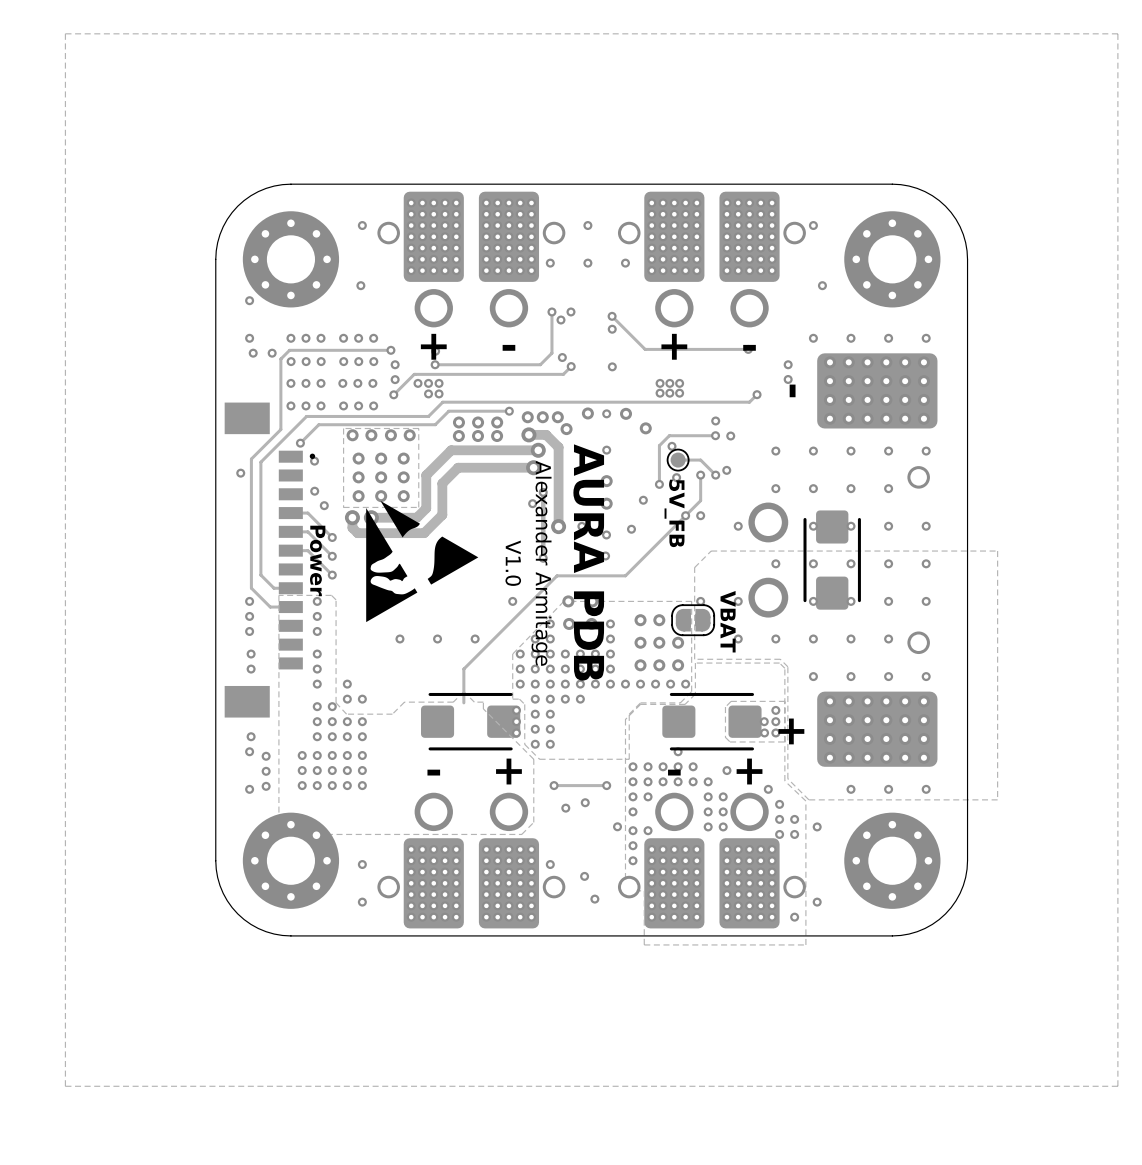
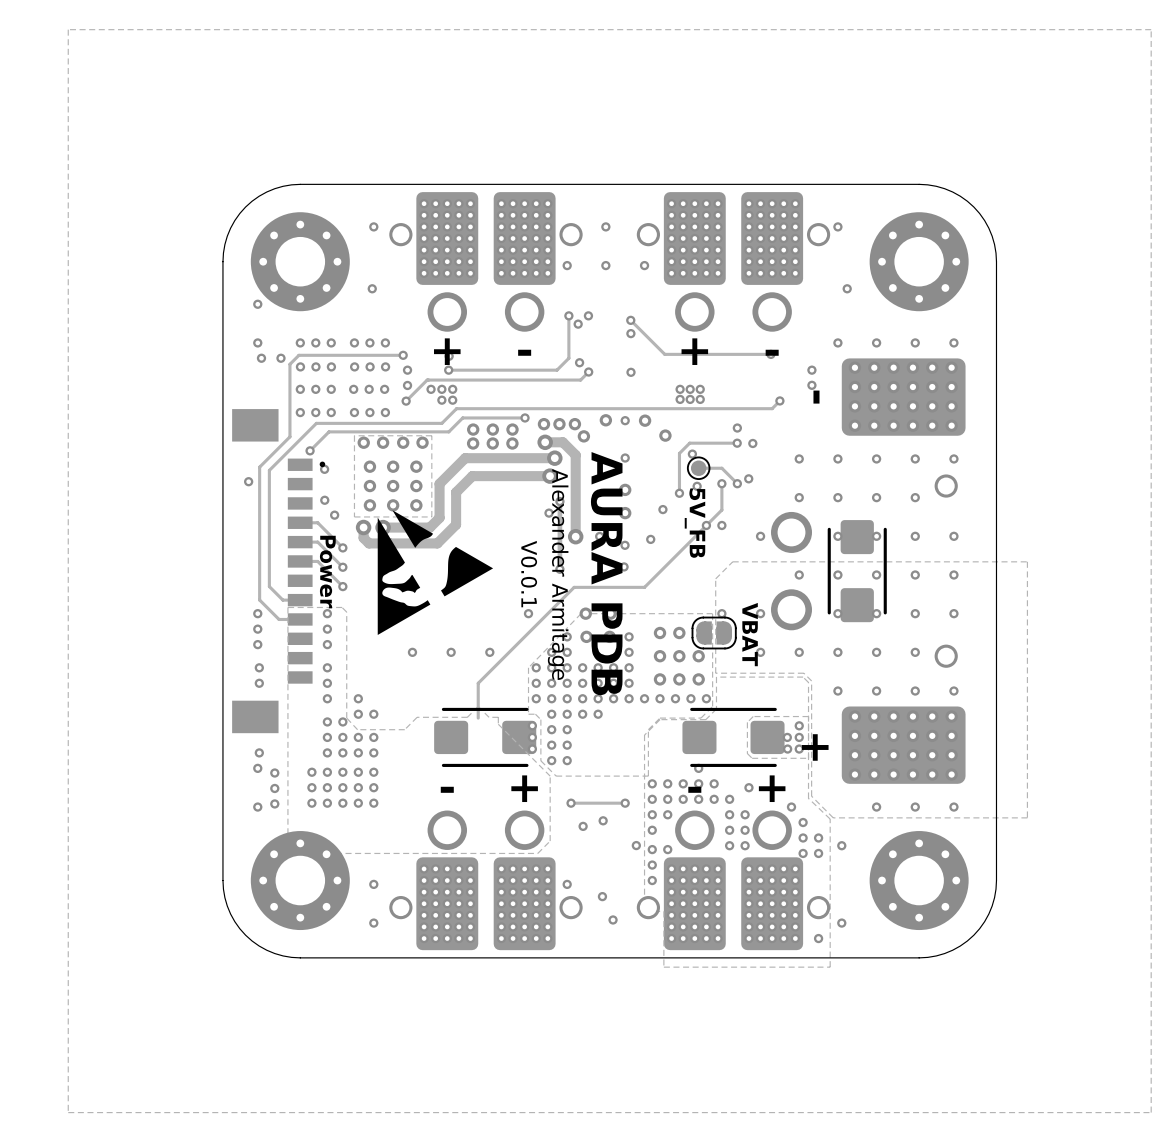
text: V1.0 (513, 563) -> V0.0.1 (529, 574)

